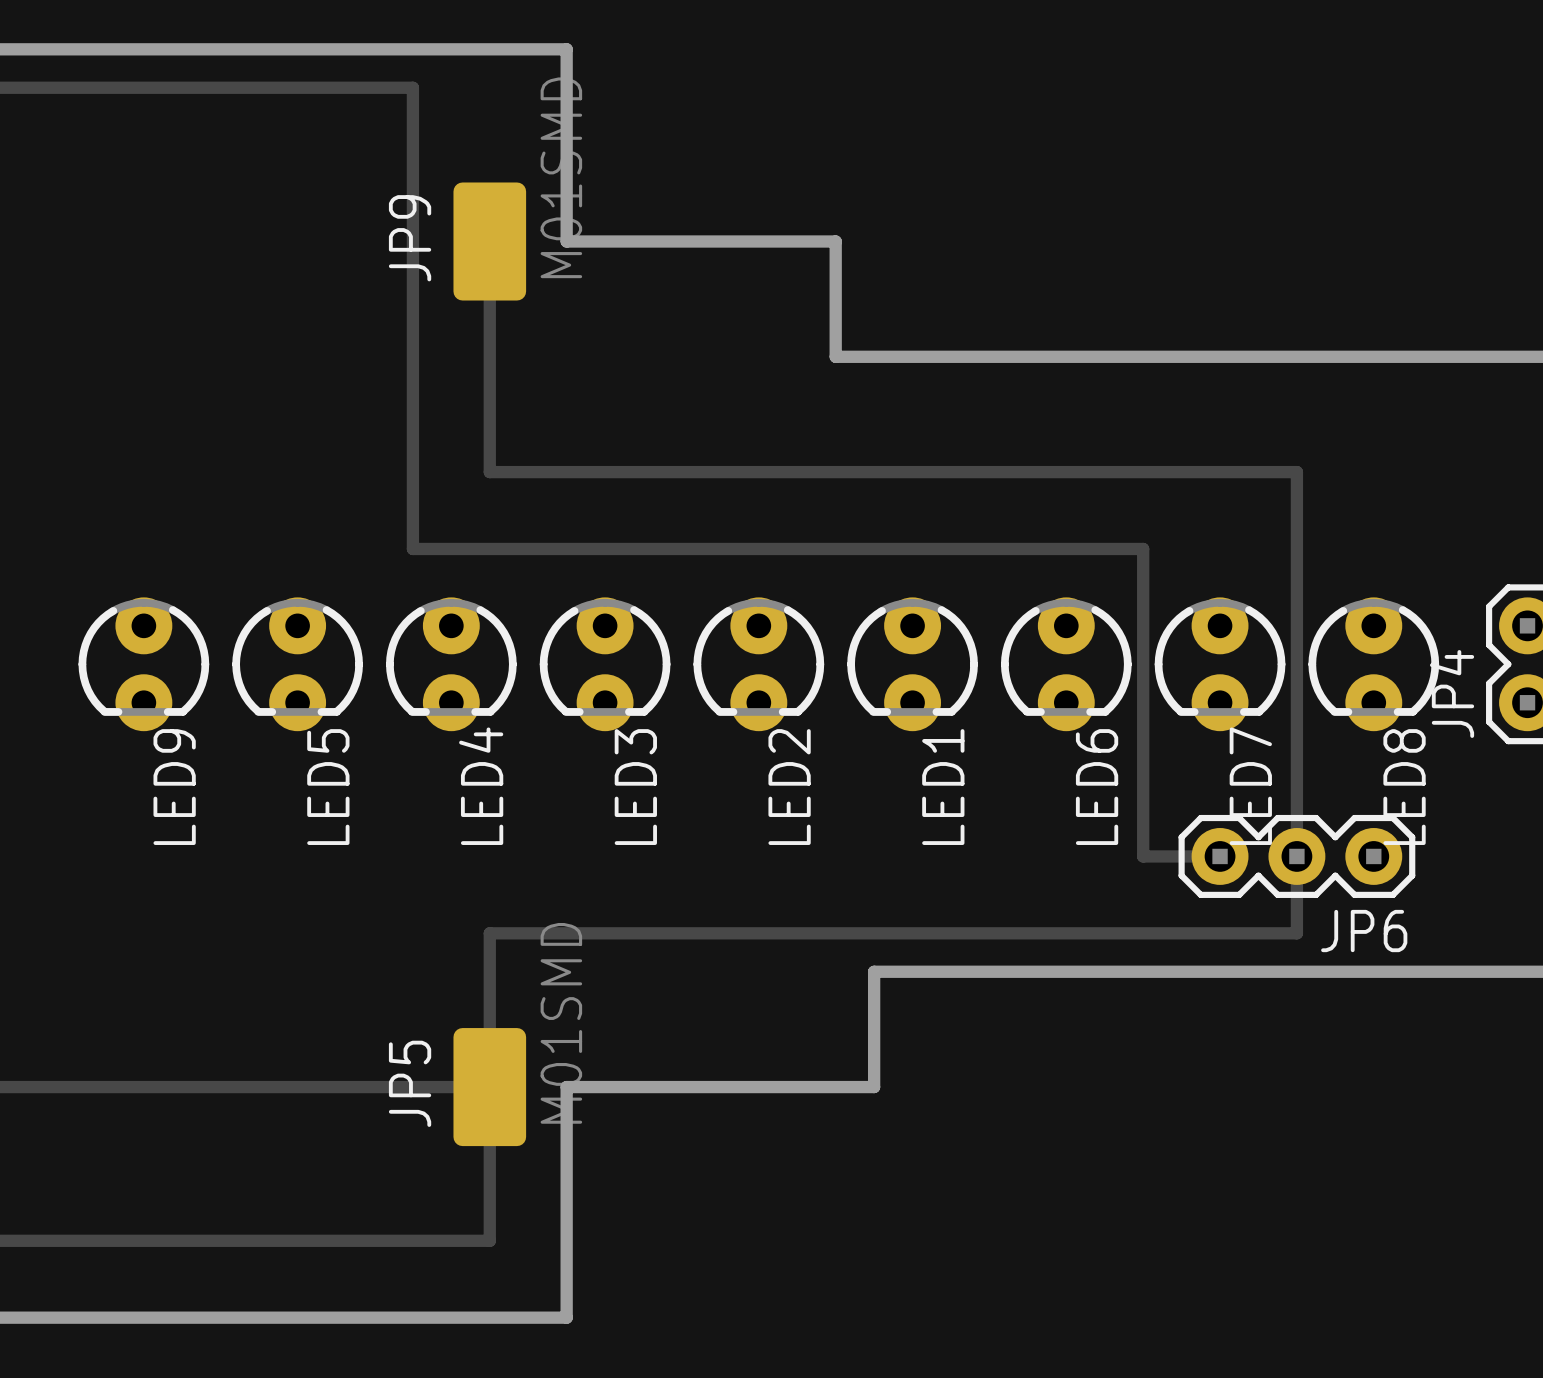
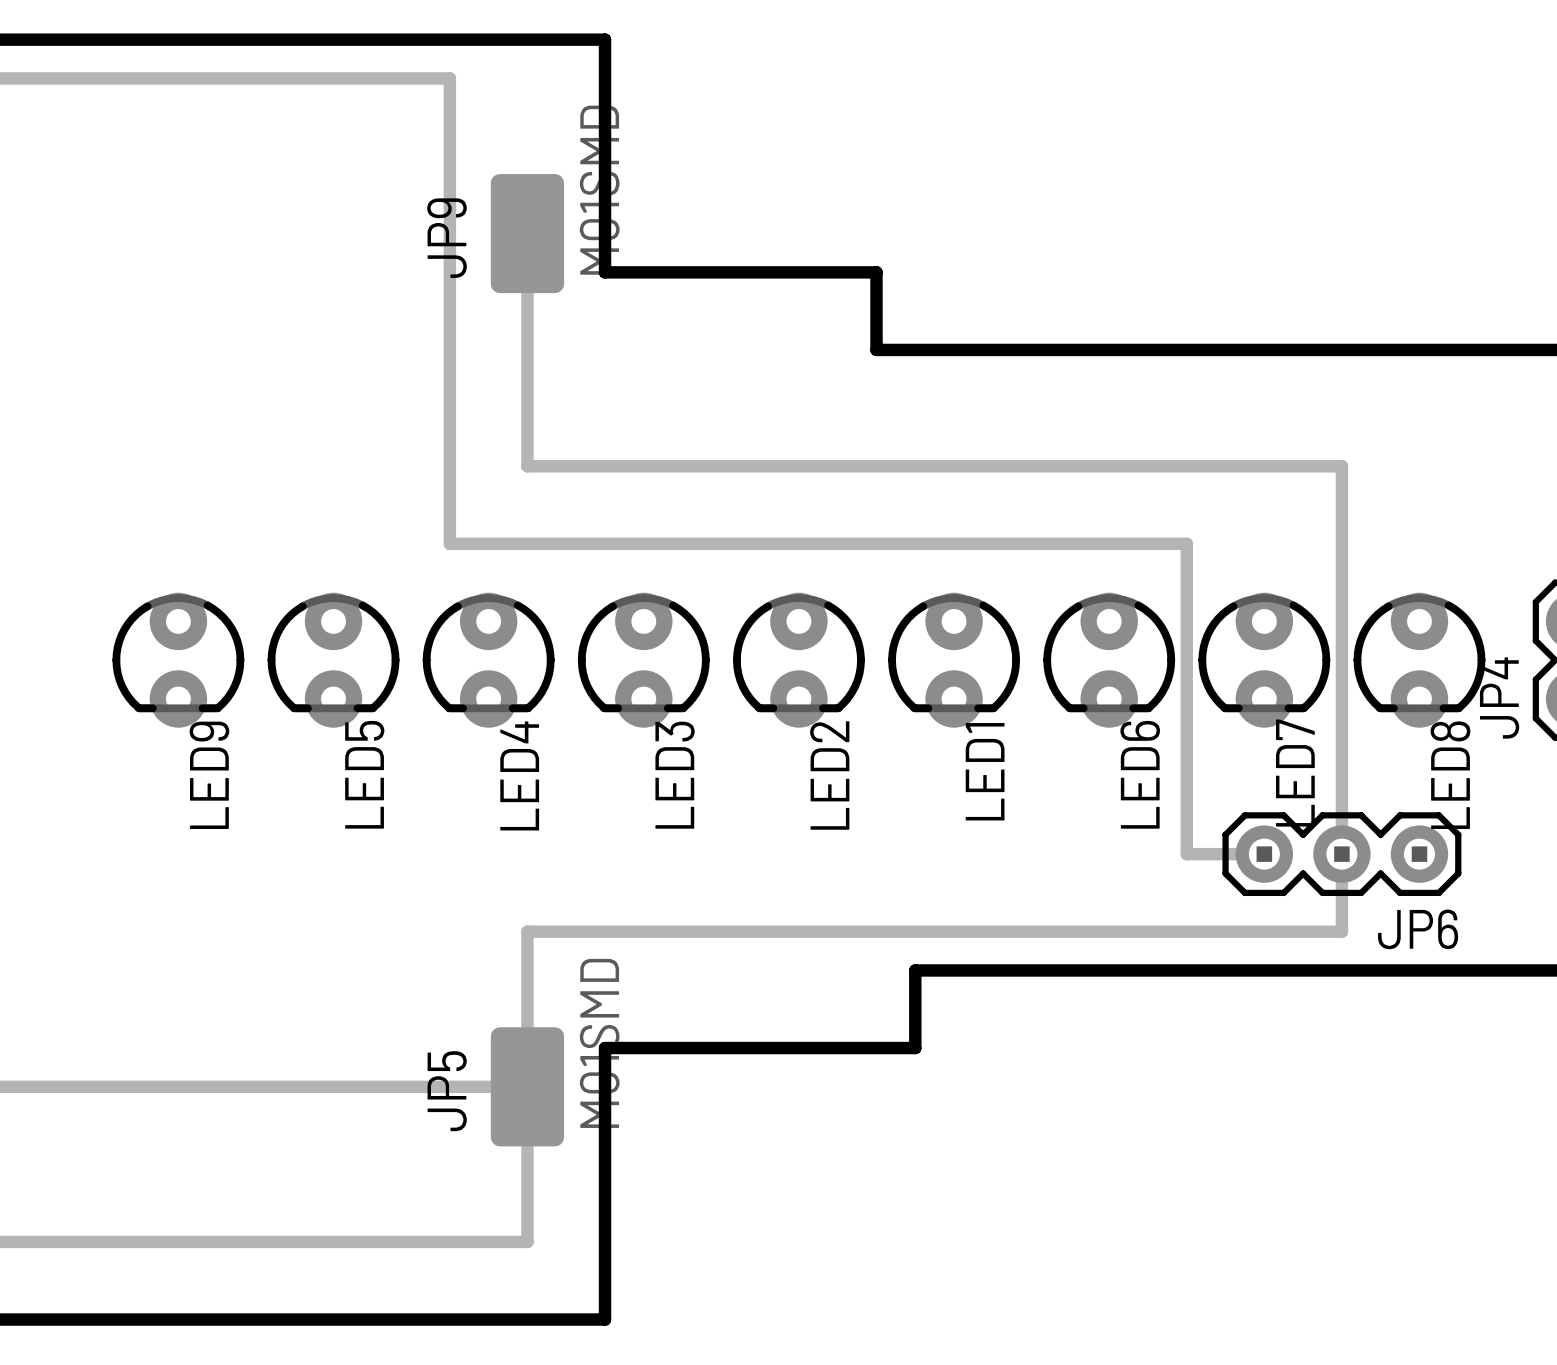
board edge: (566, 241) (835, 241) (835, 279) -> (605, 233) (605, 272) (876, 272)
board edge: (874, 1048) (874, 1087) (566, 1087) -> (915, 1048) (605, 1048) (605, 1086)

